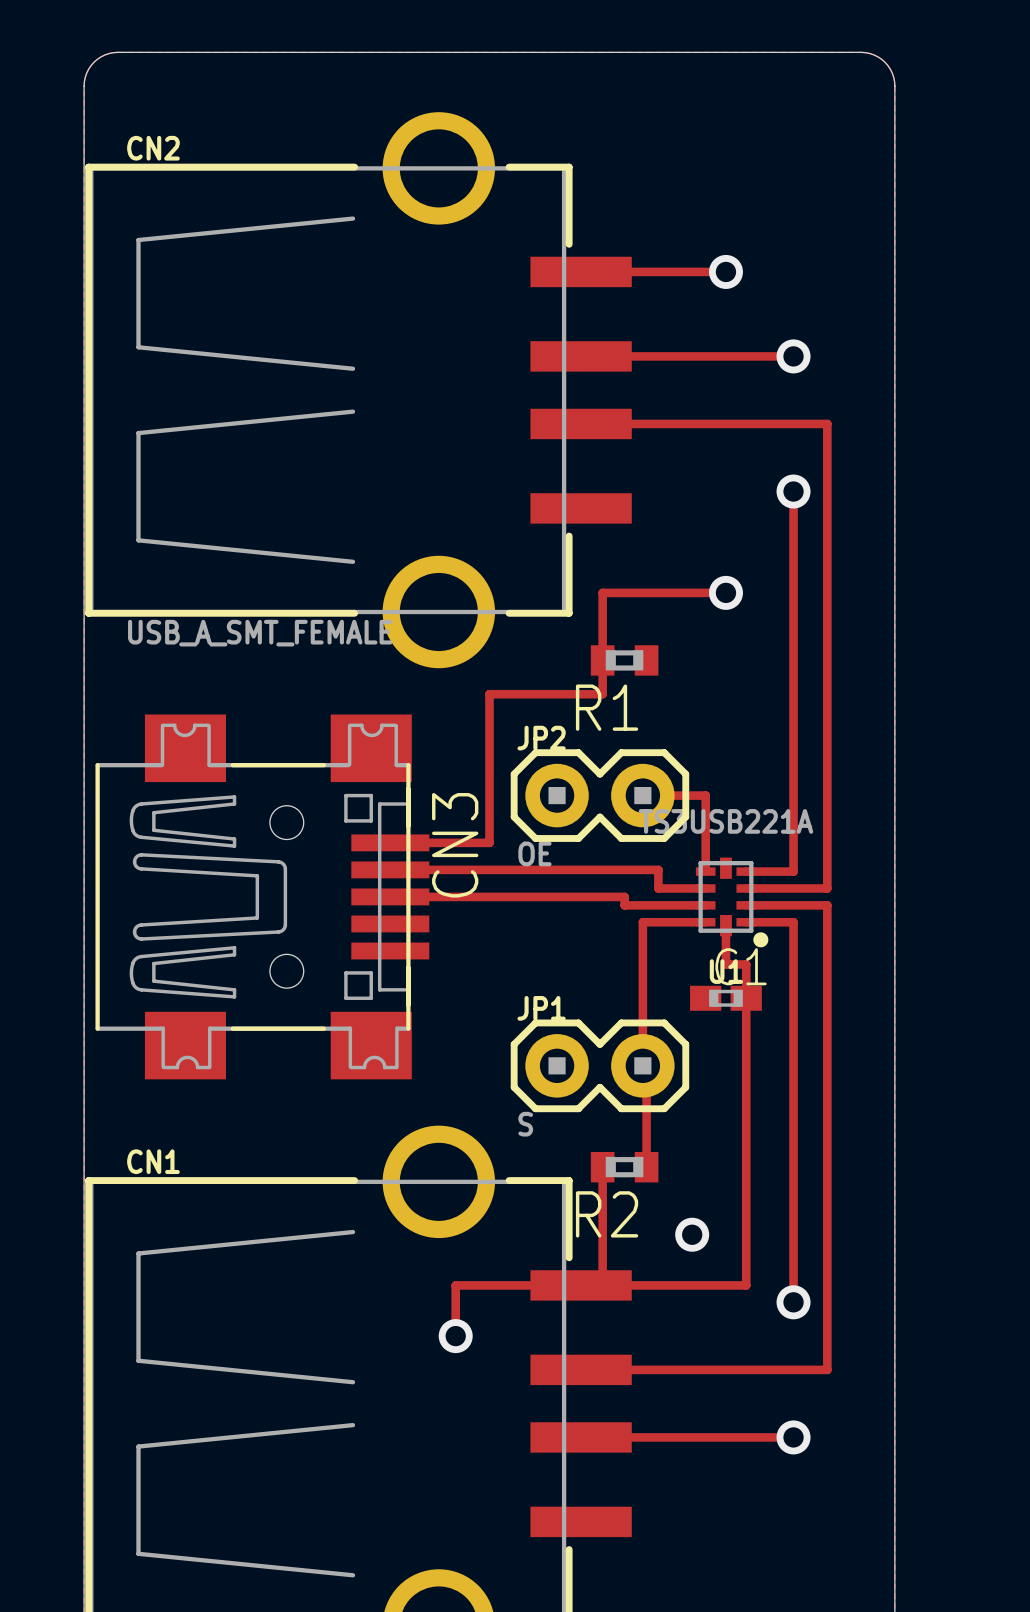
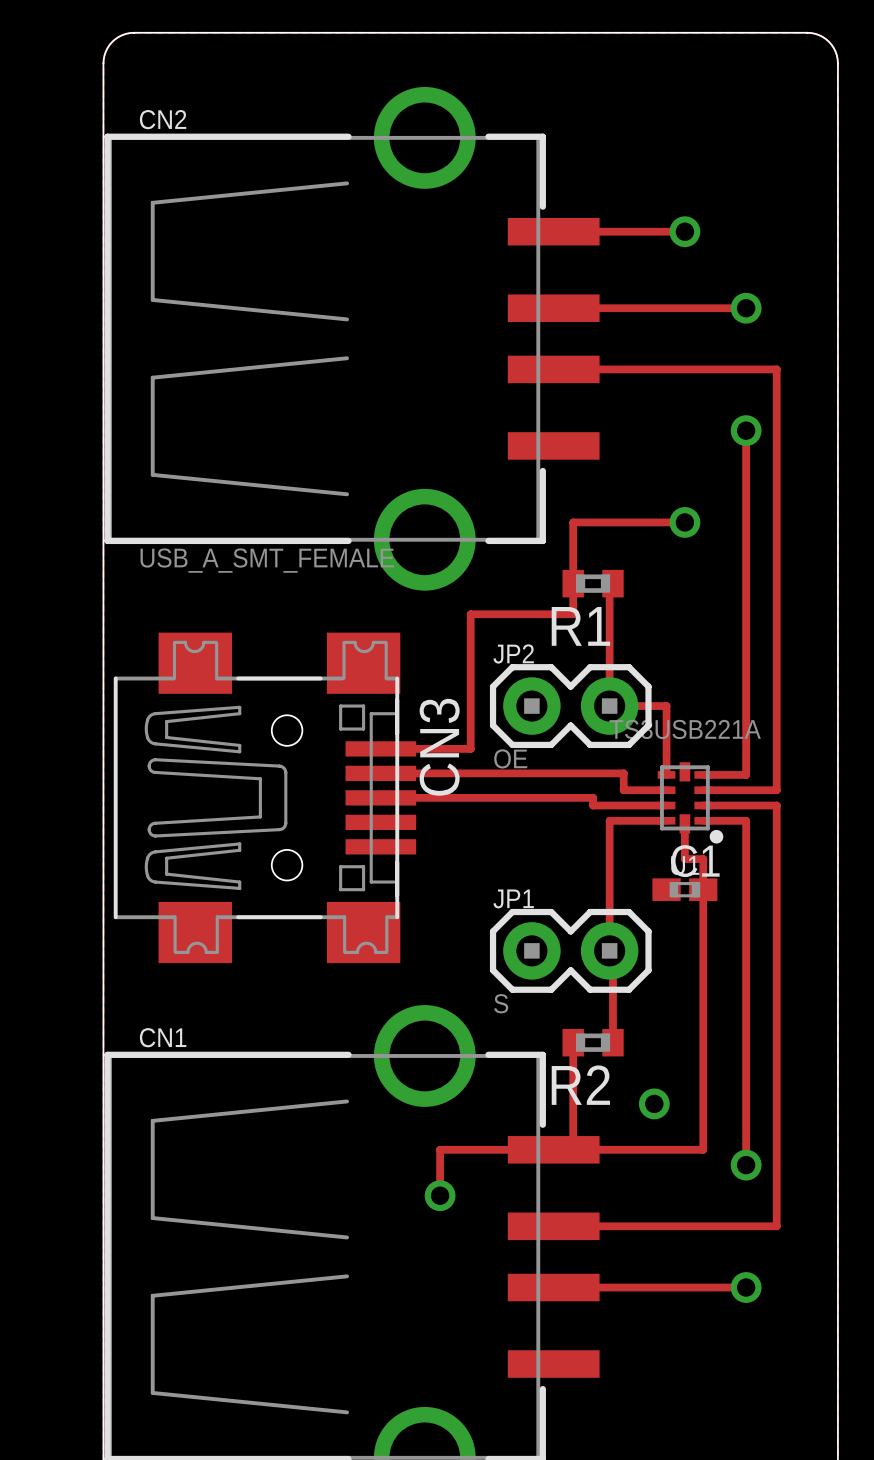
track: none -> (613, 583) (609, 583) (609, 706)

